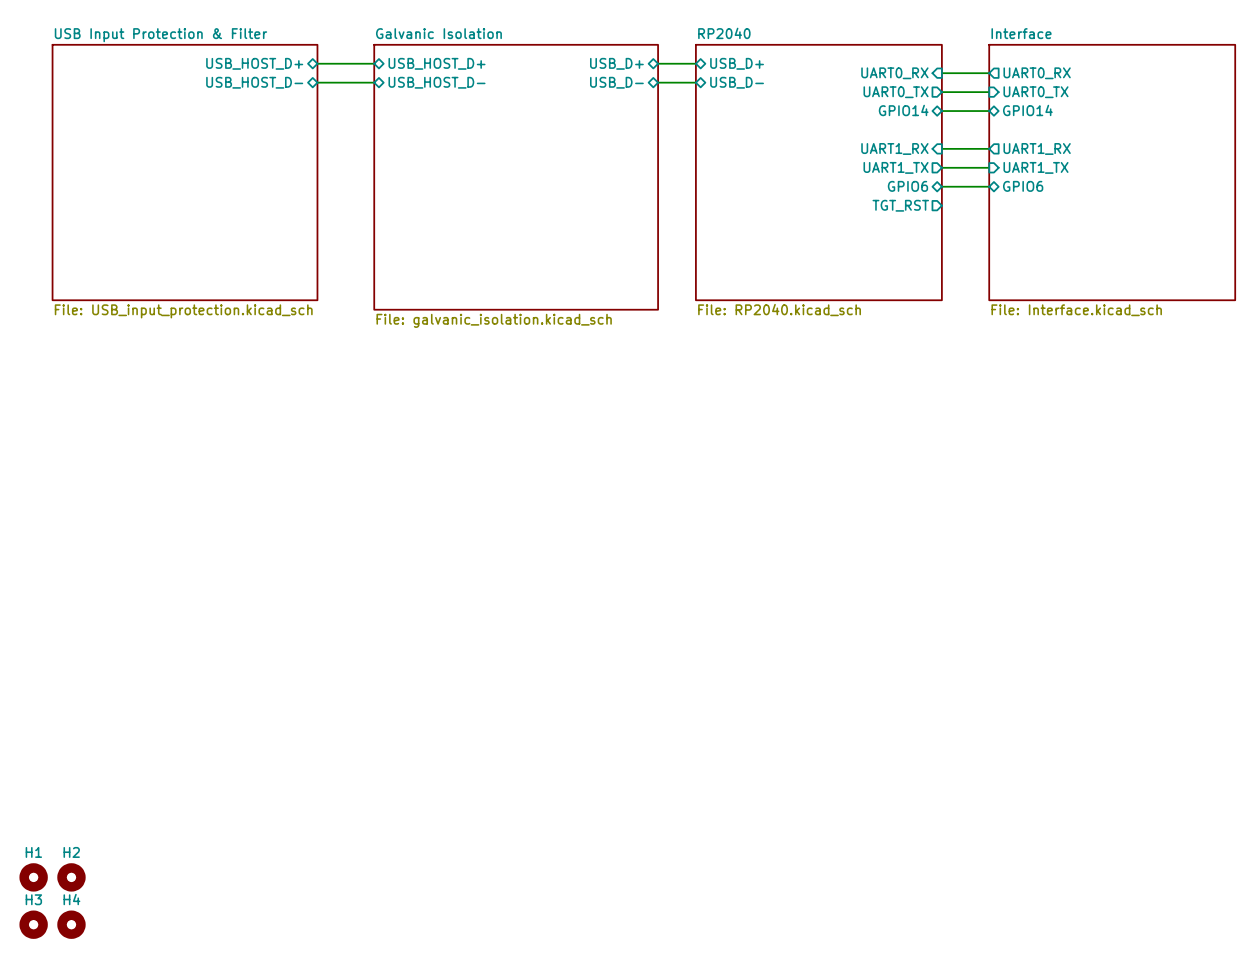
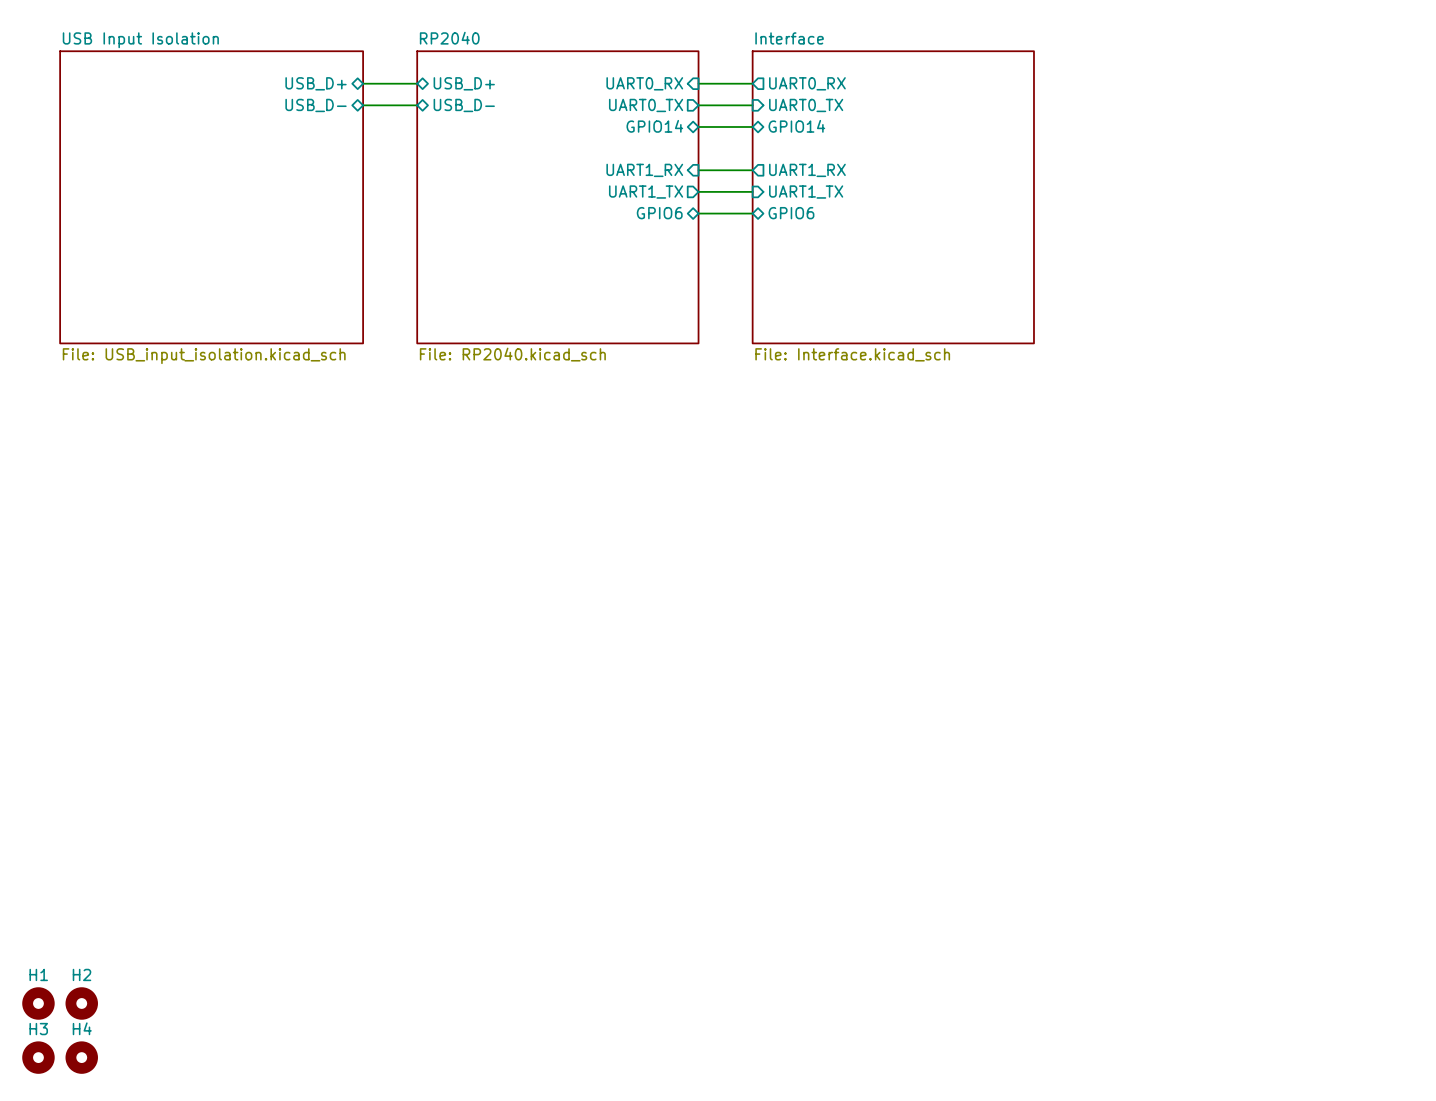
sheet USB Input Protection & Filter name: USB Input Protection & Filter (160, 35) -> USB Input Isolation (140, 40)
sheet pin: USB_HOST_D+ (254, 63) -> USB_D+ (316, 83)
wire: (317, 63) (374, 63) -> none
sheet pin: USB_HOST_D+ (437, 63) -> USB_D+ (464, 83)
sheet pin: USB_D+ (616, 63) -> none
wire: (658, 63) (695, 63) -> none
sheet pin: USB_D+ (737, 63) -> none
wire: none -> (363, 83) (417, 83)
sheet pin: none -> UART0_RX (644, 83)
wire: none -> (698, 83) (752, 83)
sheet pin: none -> UART0_RX (807, 83)
sheet pin: UART0_RX (894, 73) -> none
wire: (941, 73) (989, 73) -> none
sheet pin: UART0_RX (1037, 73) -> none
sheet pin: USB_HOST_D- (254, 82) -> USB_D- (316, 105)
wire: (317, 82) (374, 82) -> none
sheet pin: USB_HOST_D- (437, 82) -> USB_D- (464, 105)
sheet pin: USB_D- (616, 82) -> none
wire: (658, 82) (695, 82) -> none
sheet pin: USB_D- (737, 82) -> none
wire: none -> (363, 105) (417, 105)
sheet pin: none -> UART0_TX (646, 105)
wire: none -> (698, 105) (752, 105)
sheet pin: none -> UART0_TX (806, 105)
sheet pin: UART0_TX (896, 92) -> none
wire: (941, 92) (989, 92) -> none
sheet pin: UART0_TX (1035, 92) -> none
sheet pin: none -> GPIO14 (654, 126)
sheet pin: none -> GPIO14 (796, 126)
sheet pin: GPIO14 (903, 110) -> none
sheet pin: GPIO14 (1027, 110) -> none
wire: none -> (698, 126) (752, 126)
wire: (941, 111) (989, 111) -> none
sheet pin: none -> UART1_RX (644, 170)
wire: none -> (698, 170) (752, 170)
sheet pin: none -> UART1_RX (807, 170)
sheet pin: UART1_RX (894, 148) -> none
wire: (941, 148) (989, 148) -> none
sheet pin: UART1_RX (1037, 148) -> none
sheet pin: none -> UART1_TX (646, 192)
wire: none -> (698, 191) (752, 191)
sheet pin: none -> UART1_TX (806, 192)
sheet pin: UART1_TX (896, 167) -> none
wire: (941, 167) (989, 167) -> none
sheet pin: UART1_TX (1035, 167) -> none
sheet Interface: none -> File: Interface.kicad_sch (893, 197)
sheet RP2040 position: (818, 172) -> (557, 197)
sheet Interface: File: Interface.kicad_sch (1112, 172) -> none
sheet Galvanic Isolation: File: galvanic_isolation.kicad_sch (516, 177) -> none
sheet pin: none -> GPIO6 (659, 213)
wire: none -> (698, 213) (752, 213)
sheet pin: none -> GPIO6 (791, 213)
sheet pin: GPIO6 (907, 186) -> none
wire: (941, 186) (989, 186) -> none
sheet pin: GPIO6 (1023, 186) -> none
sheet pin: TGT_RST (900, 205) -> none
sheet USB Input Protection & Filter value: File: USB_input_protection.kicad_sch (183, 311) -> File: USB_input_isolation.kicad_sch (204, 356)

